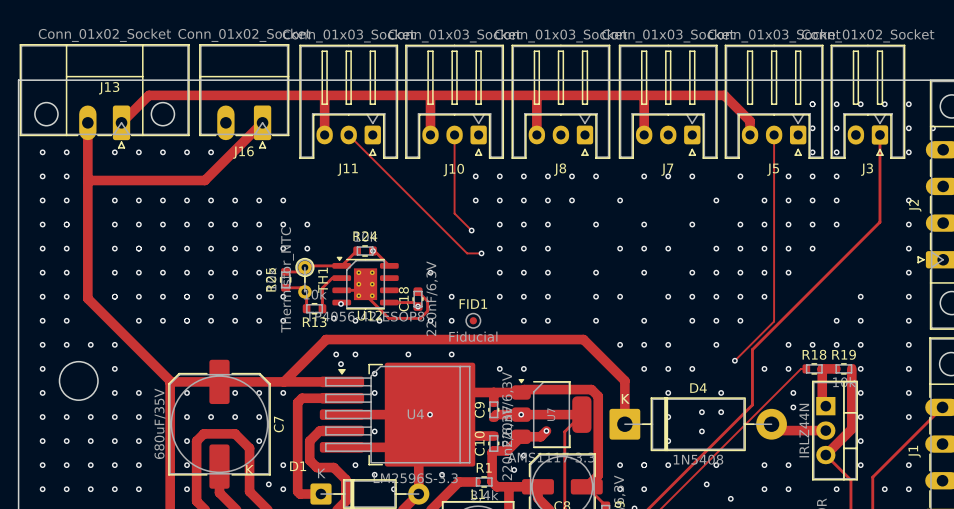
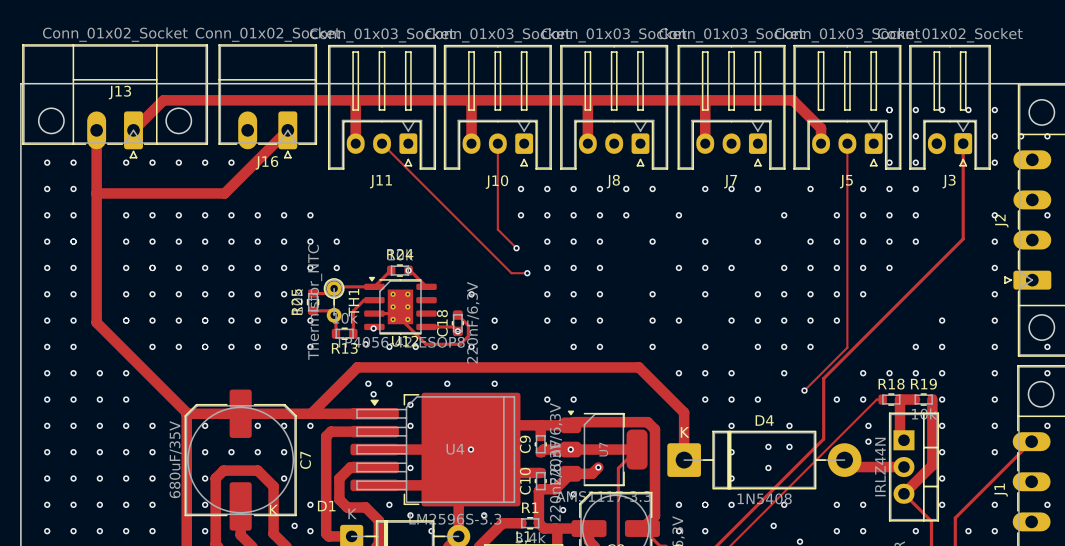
FID1: Fiducial (473, 320) -> none
round board edge: [59, 361, 99, 401] -> none
via: none -> (73, 399)
via: none -> (99, 399)
via: none -> (73, 425)
via: none -> (99, 425)

